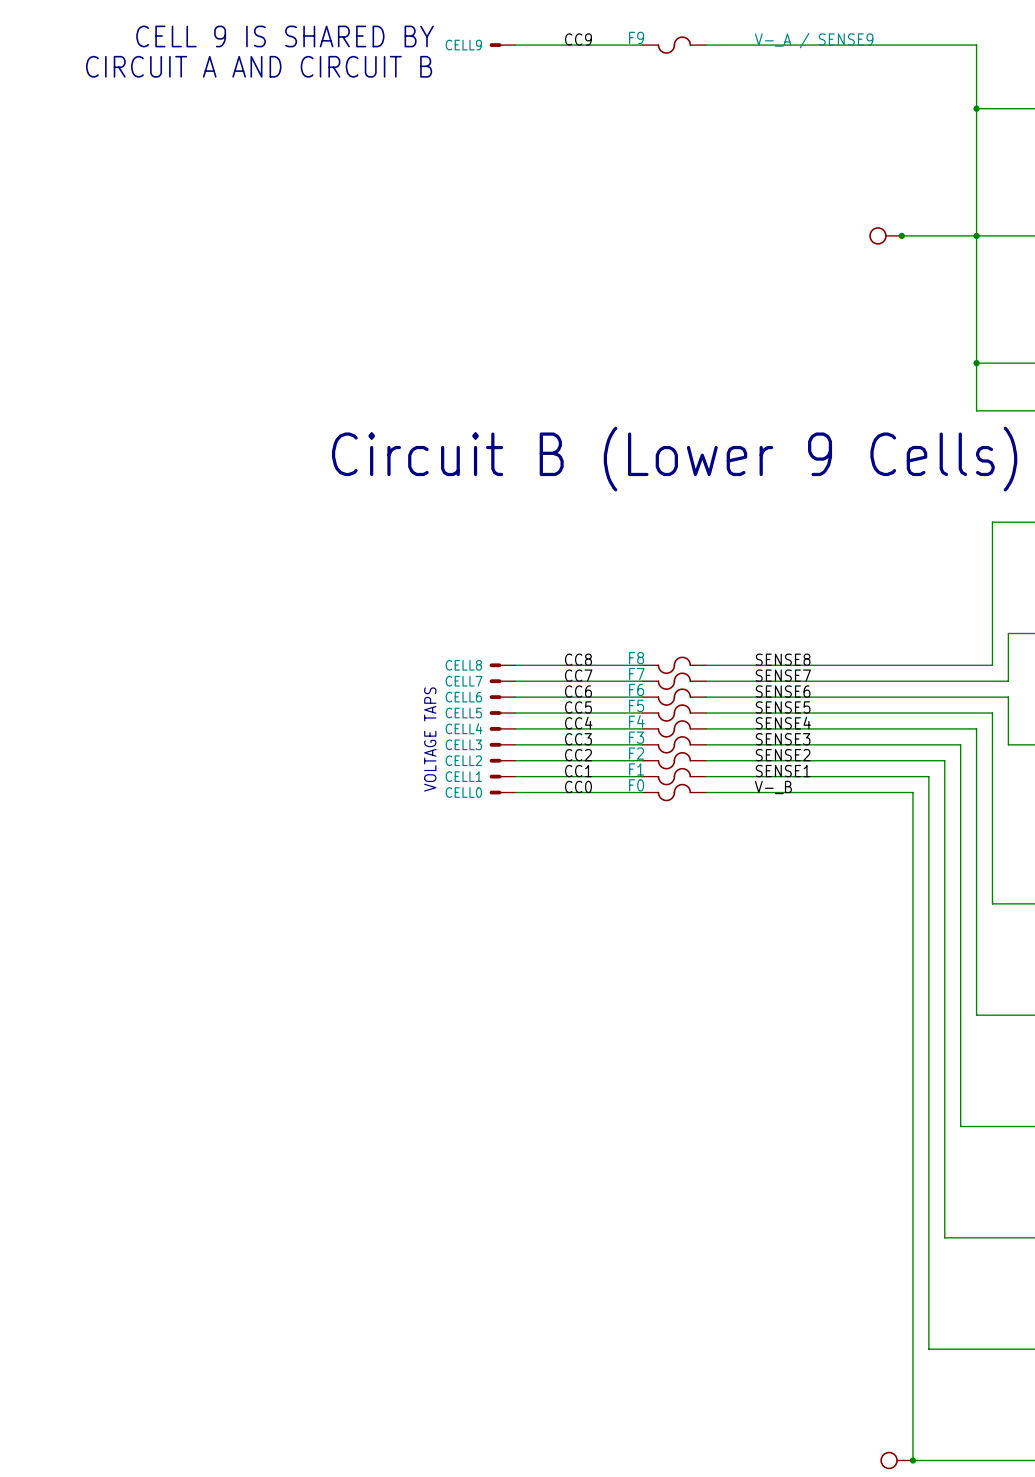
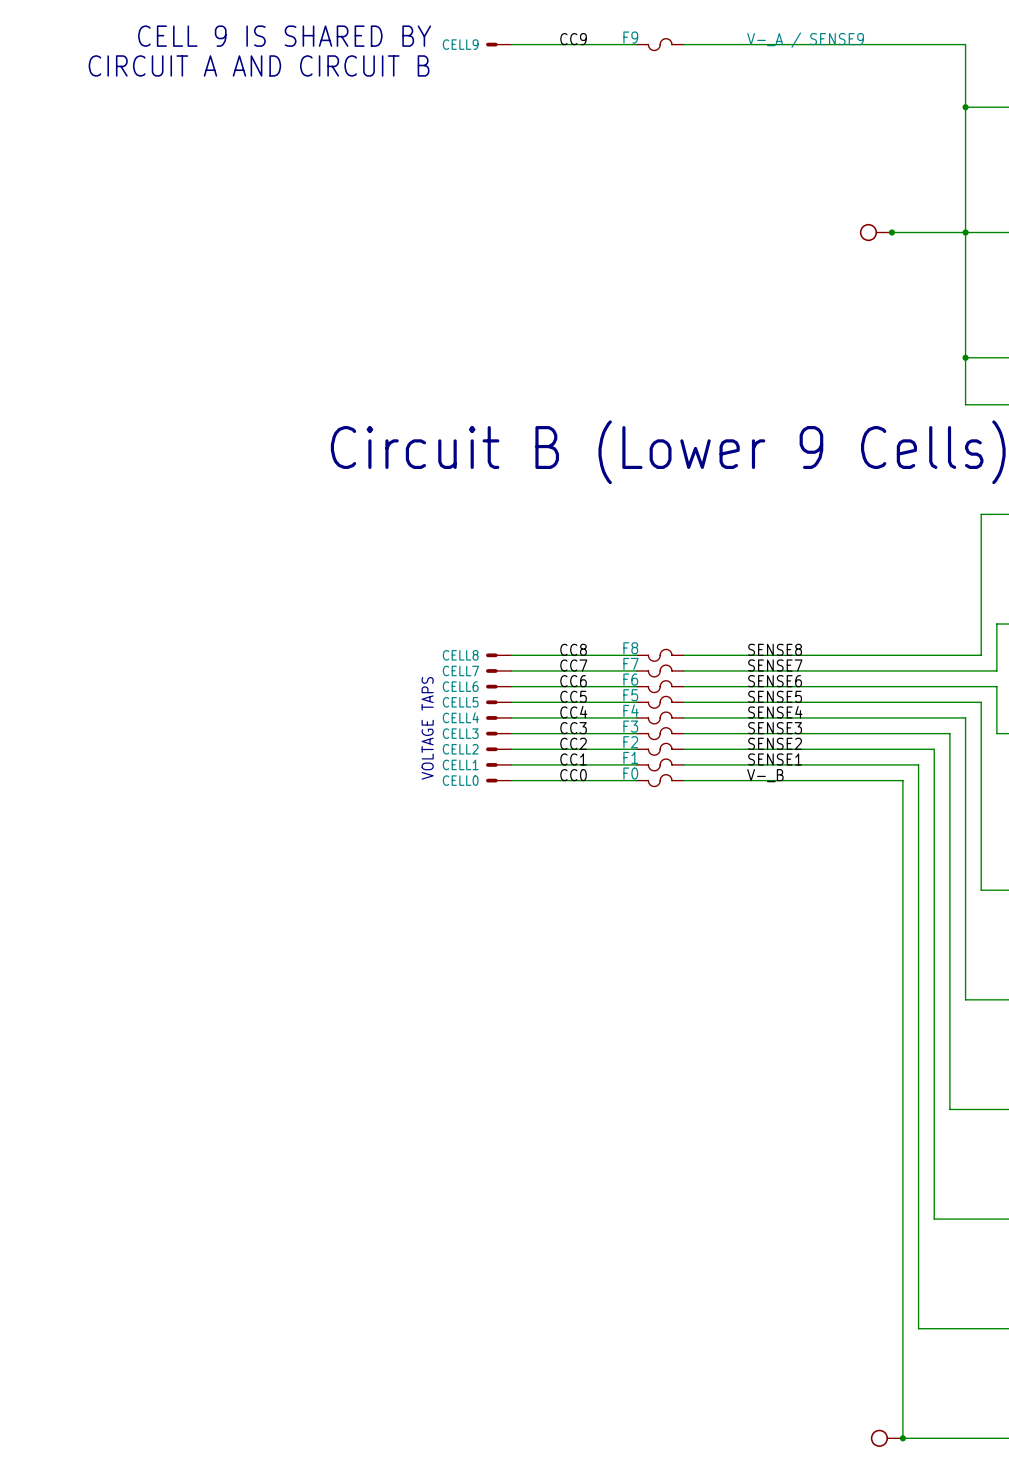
F9 symbol: [642, 36, 707, 54] -> [636, 38, 685, 51]
F8 symbol: [642, 656, 707, 675] -> [636, 648, 685, 662]
F7 symbol: [642, 672, 707, 690] -> [636, 664, 685, 678]
F6 symbol: [642, 688, 707, 706] -> [636, 680, 685, 693]
F5 symbol: [642, 704, 707, 722] -> [636, 695, 685, 709]
F4 symbol: [642, 720, 707, 738] -> [636, 711, 685, 725]
F3 symbol: [642, 736, 707, 754] -> [636, 727, 685, 740]
F2 symbol: [642, 751, 707, 770] -> [636, 742, 685, 756]
F1 symbol: [642, 767, 707, 786] -> [636, 758, 685, 772]
F0 symbol: [642, 783, 707, 802] -> [636, 774, 685, 787]

